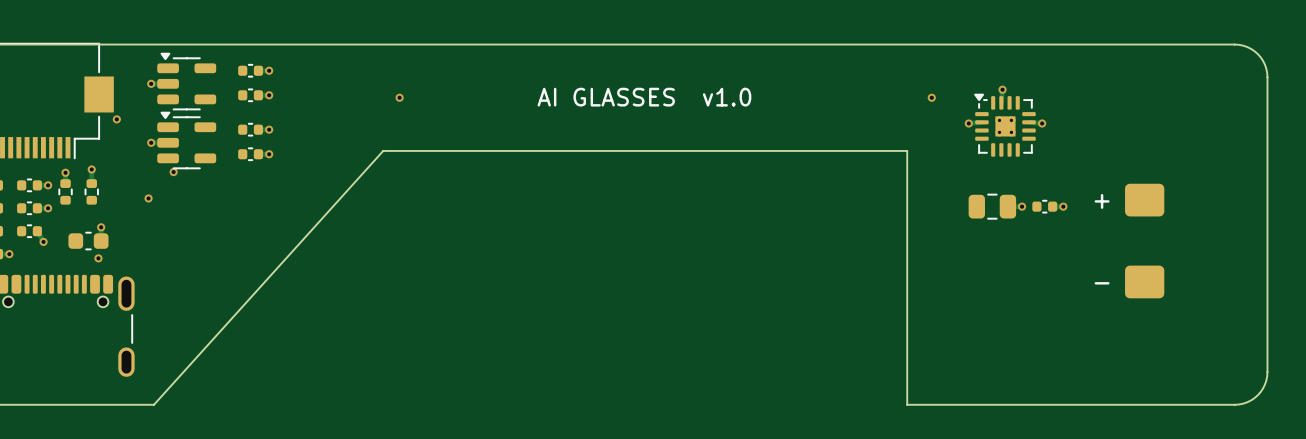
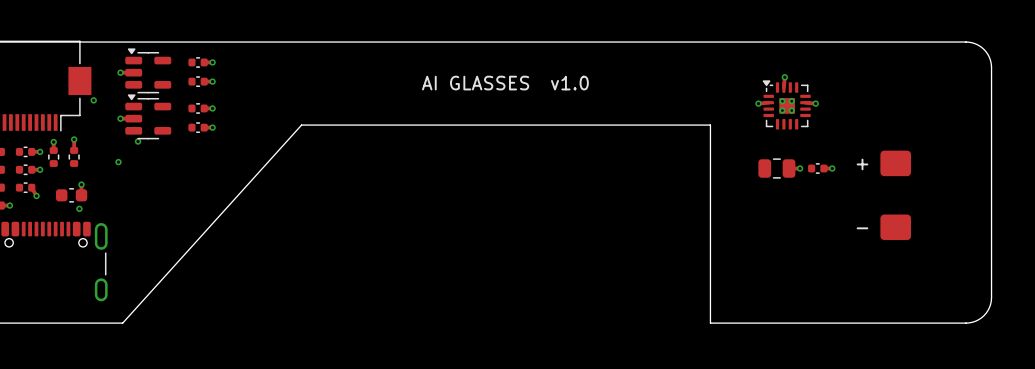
via: (399, 97) -> none
via: (931, 97) -> none

